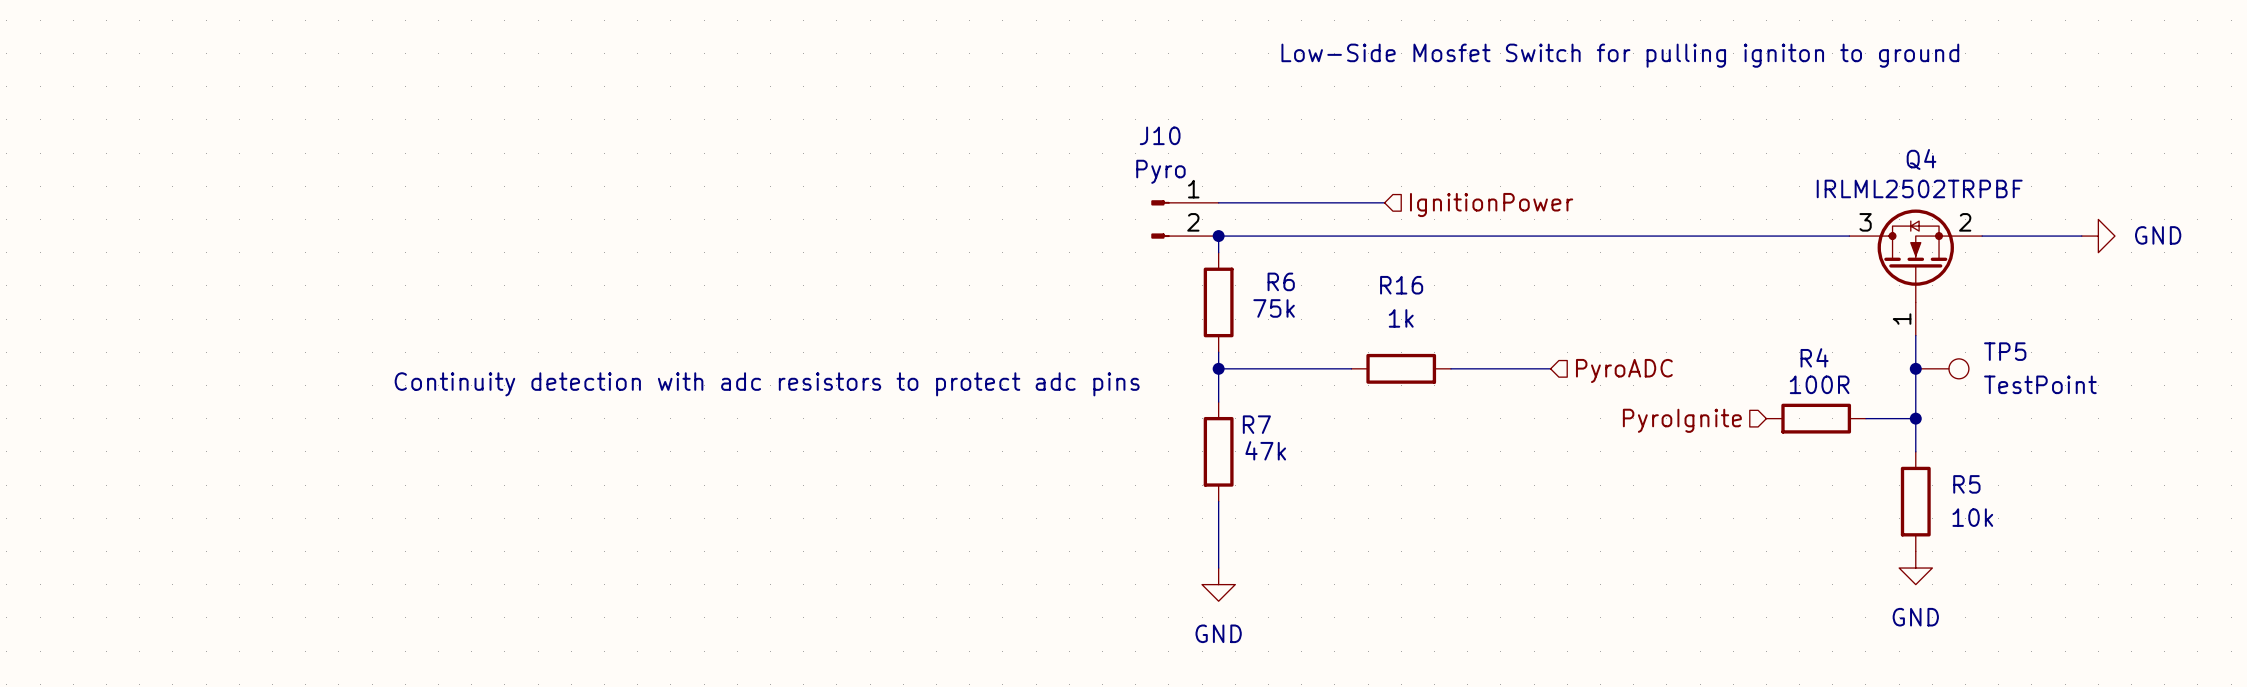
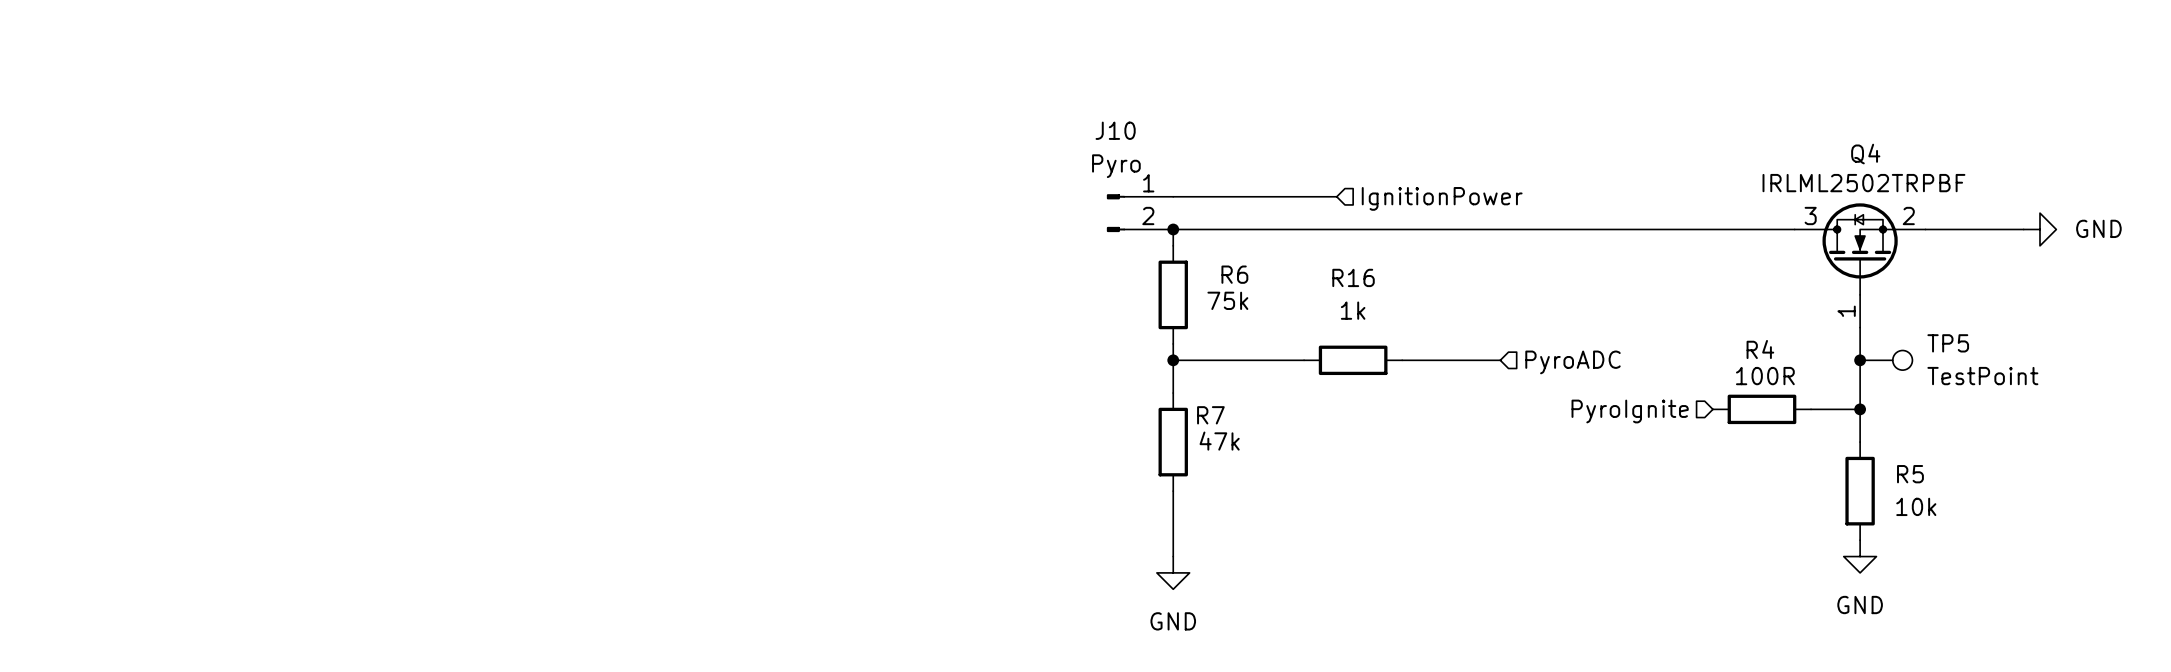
text: Low-Side Mosfet Switch for pulling igniton to ground (1620, 55) -> none
text: Continuity detection with adc resistors to protect adc pins (767, 384) -> none

